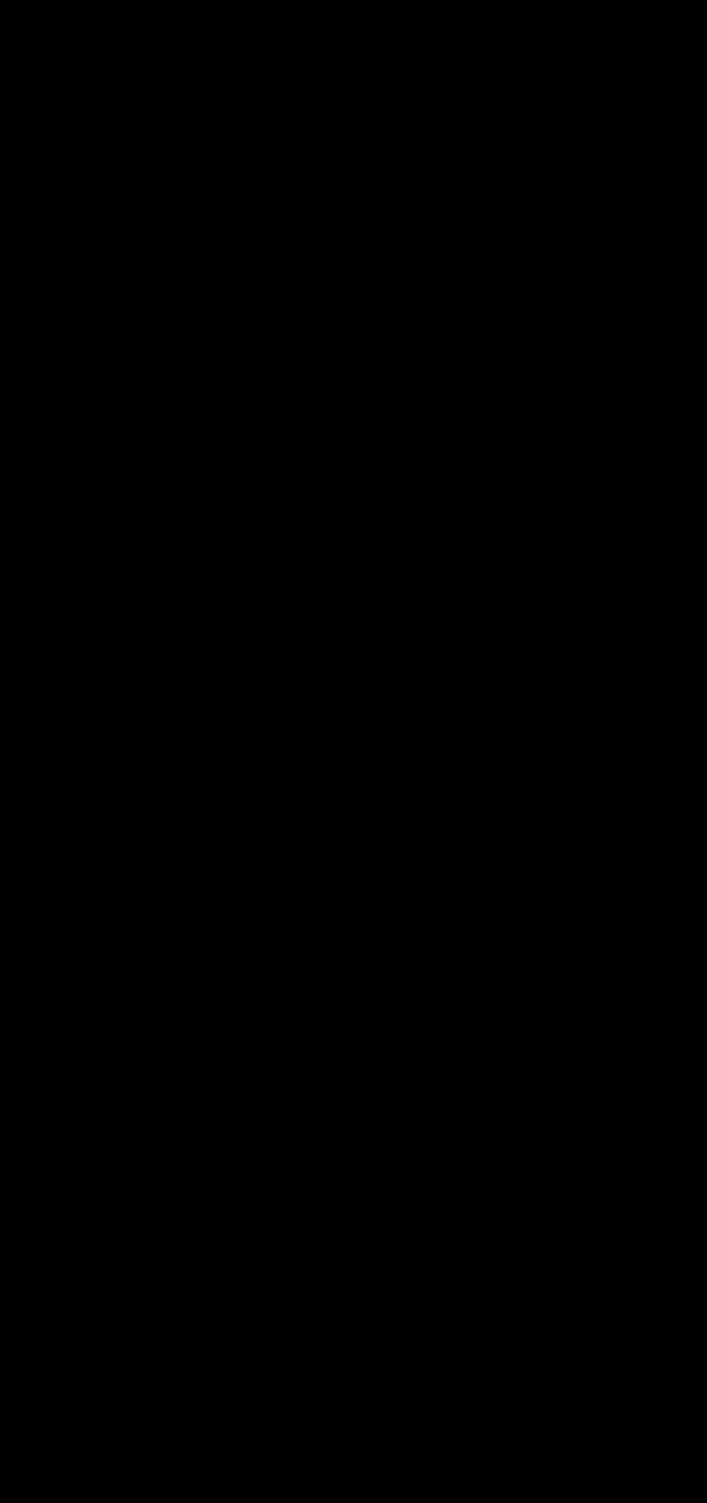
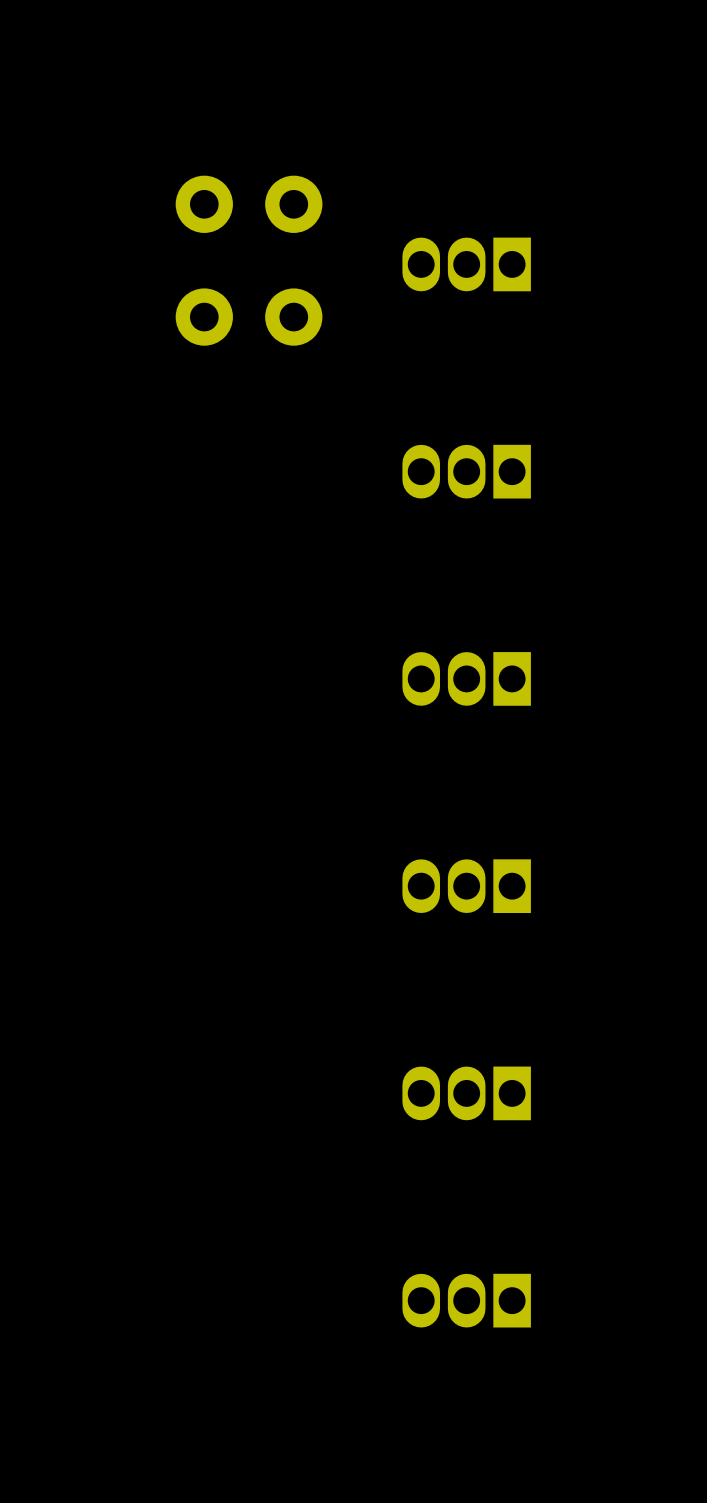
part: none -> (249, 204)
part: none -> (466, 264)
part: none -> (249, 317)
part: none -> (466, 471)
part: none -> (466, 678)
part: none -> (466, 886)
part: none -> (466, 1093)
part: none -> (466, 1300)

